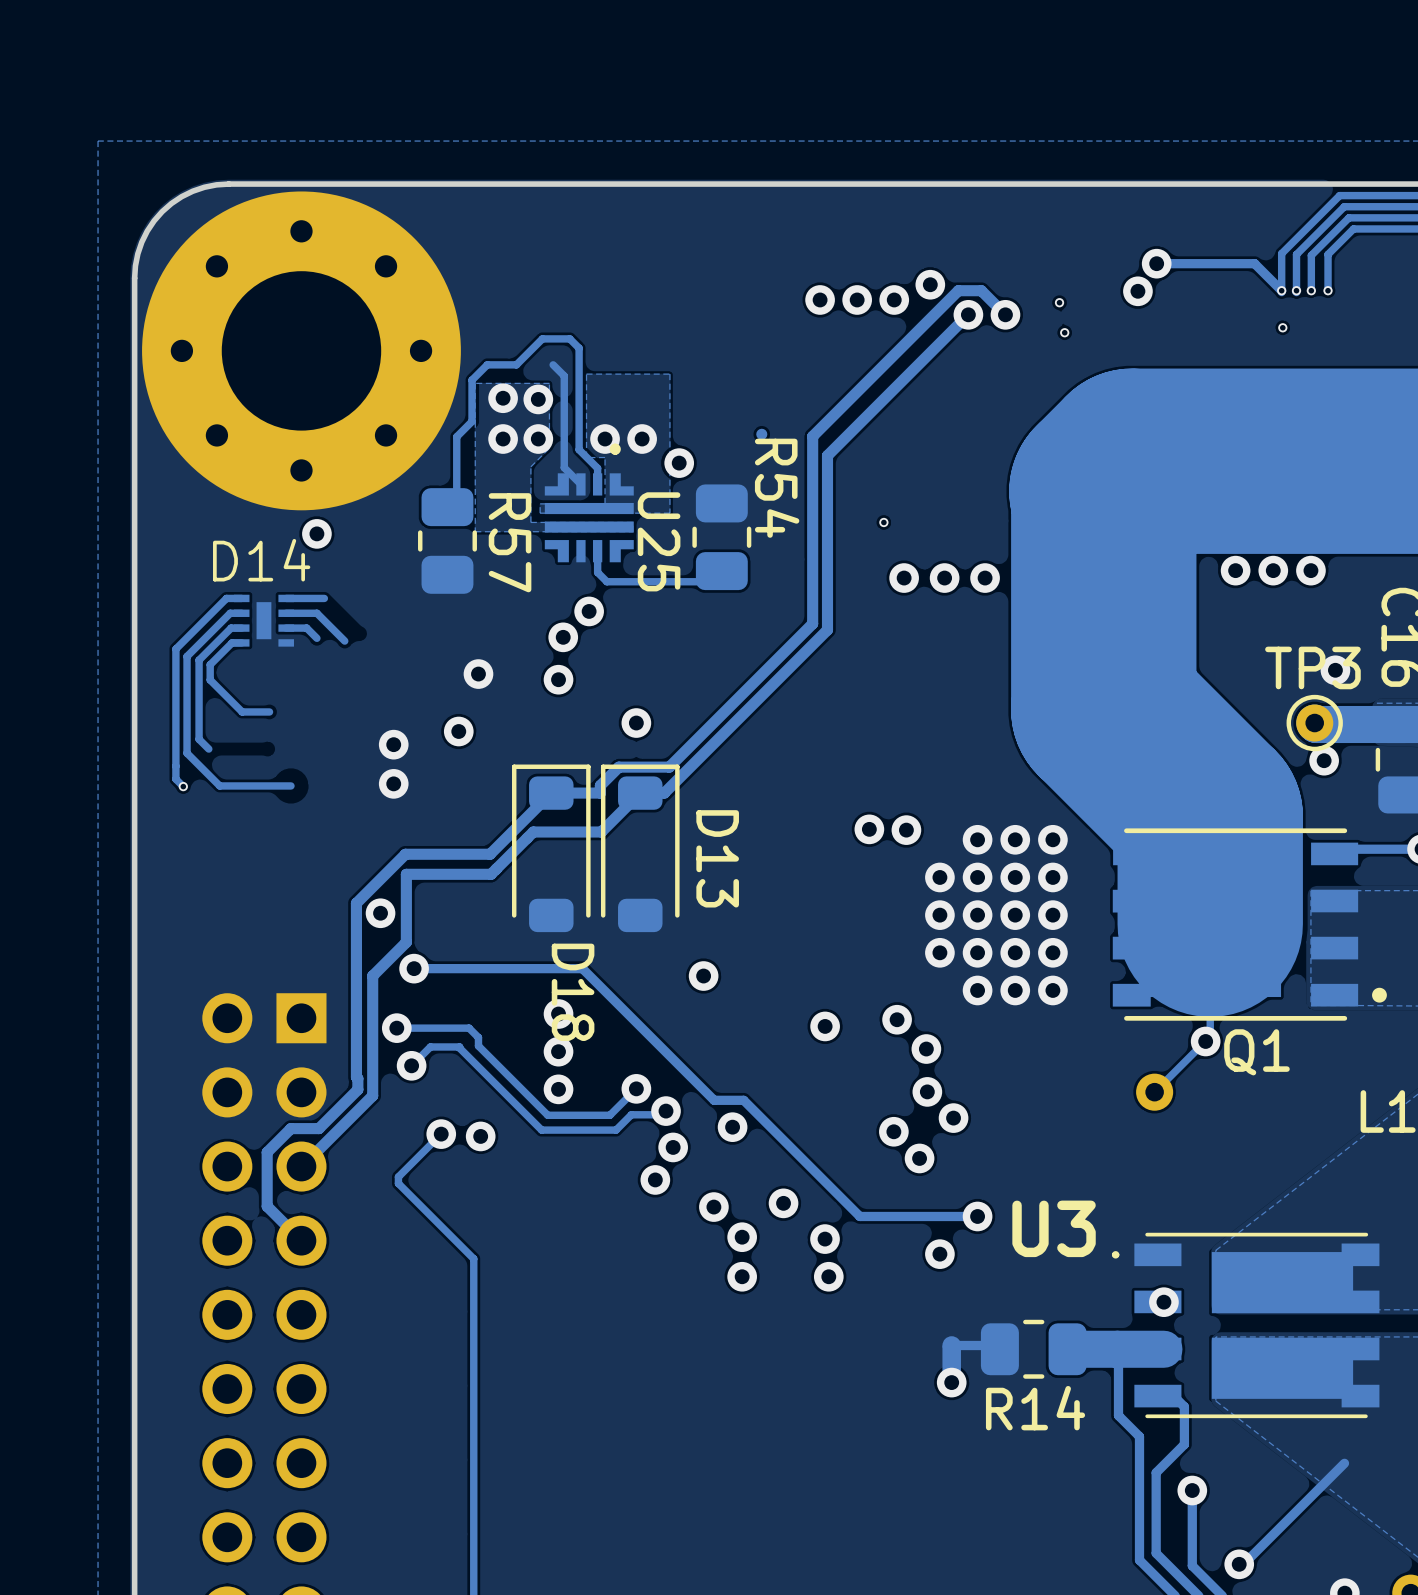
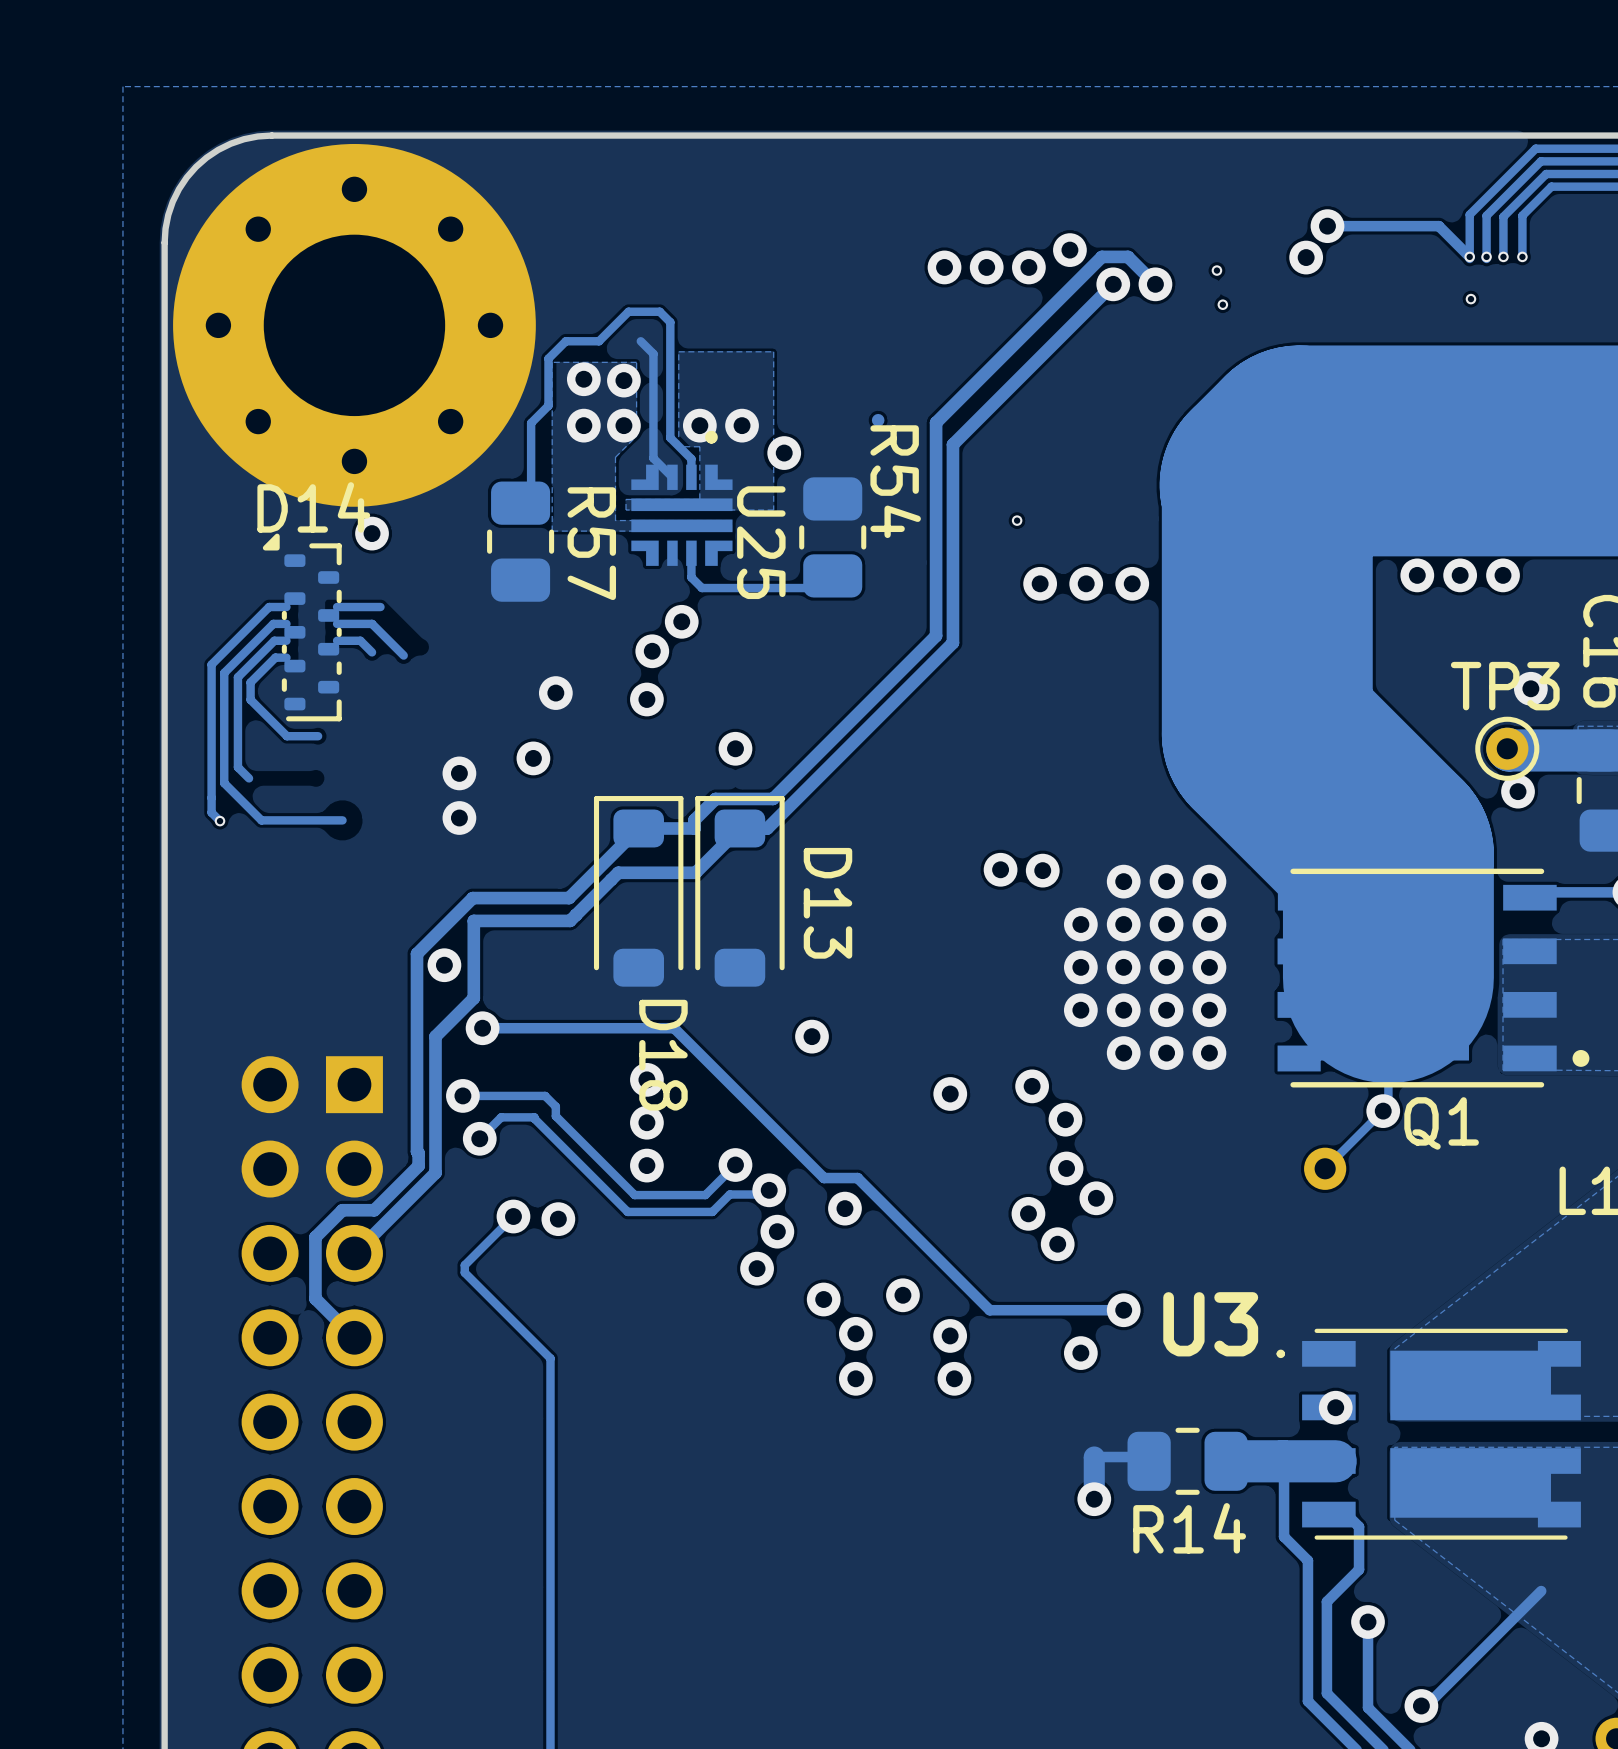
D14 footprint: [233, 594, 294, 647] -> [262, 533, 342, 722]

